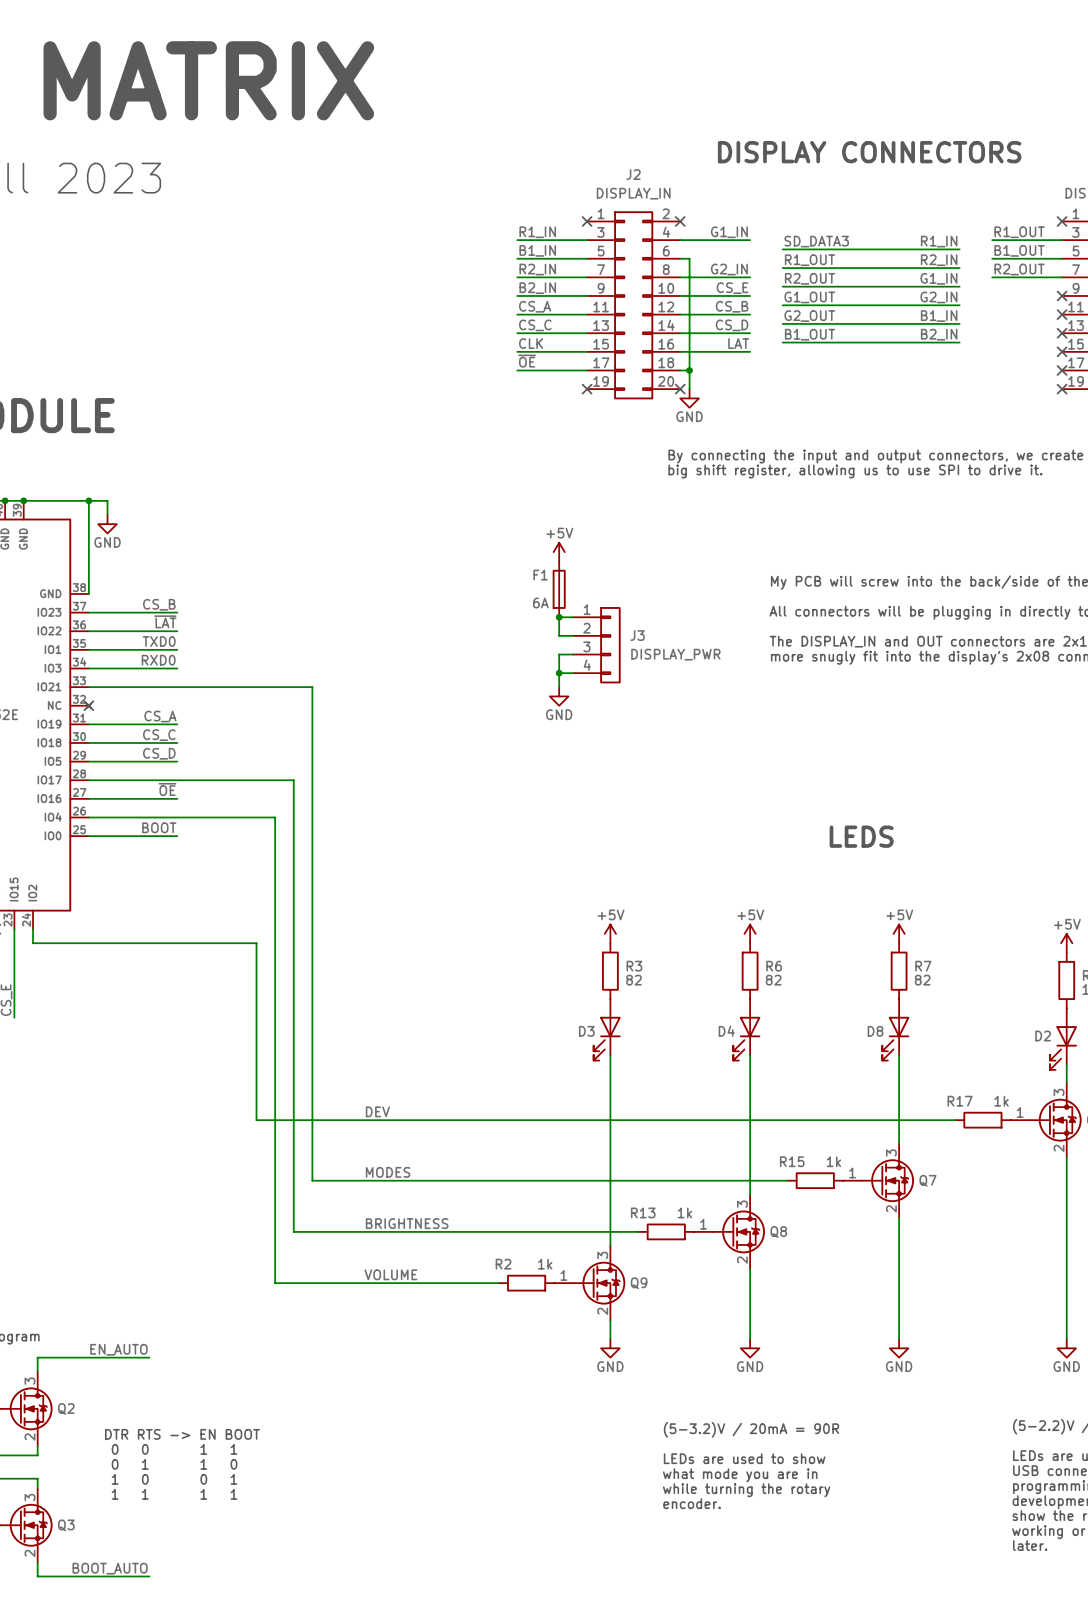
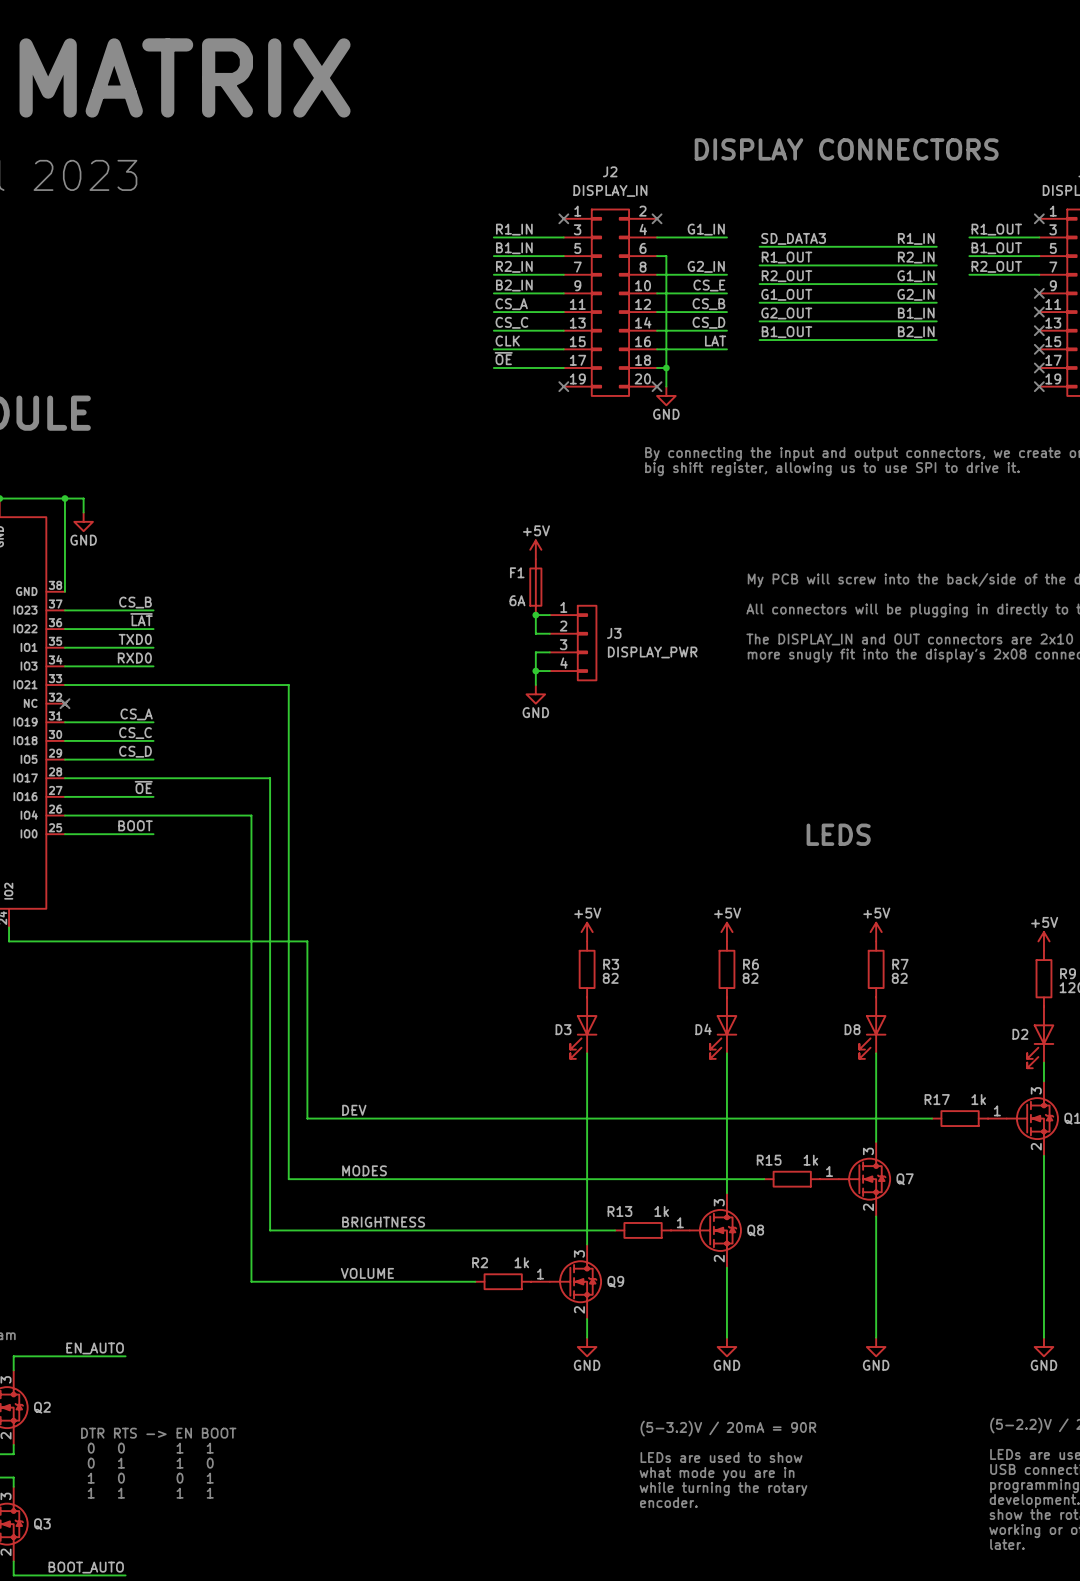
wire: (256, 943) (256, 1120) (331, 1120) -> (232, 941) (307, 941) (307, 1118)

